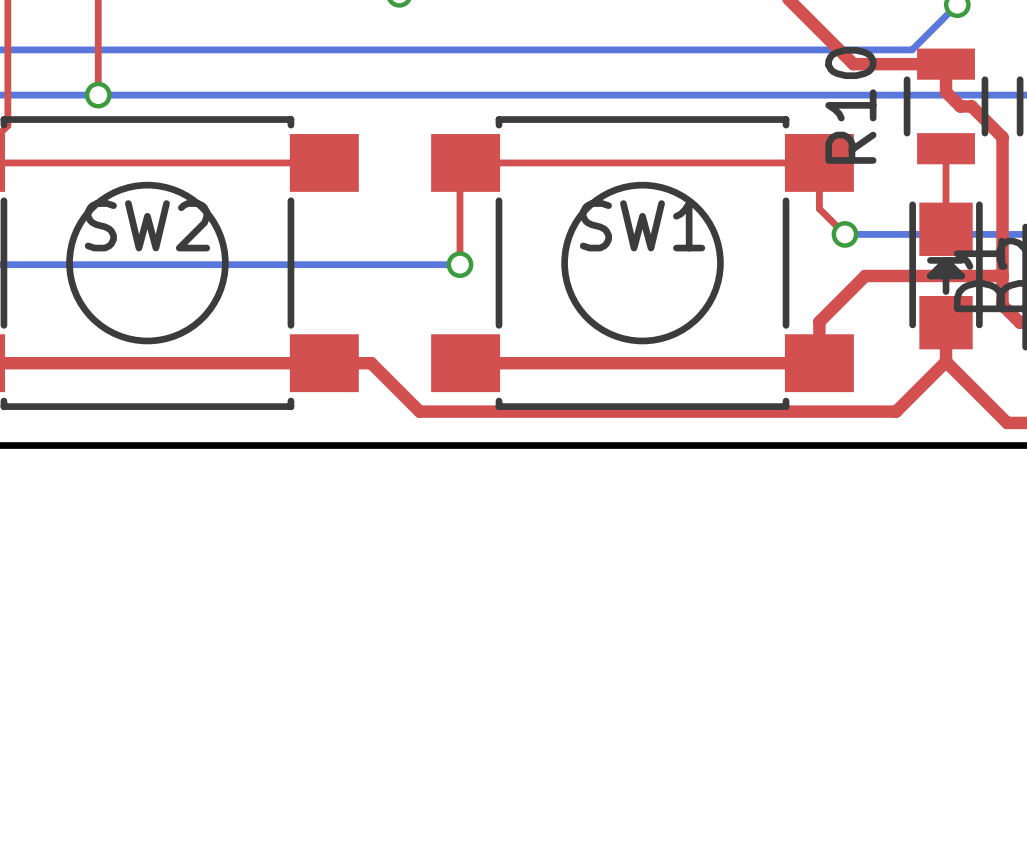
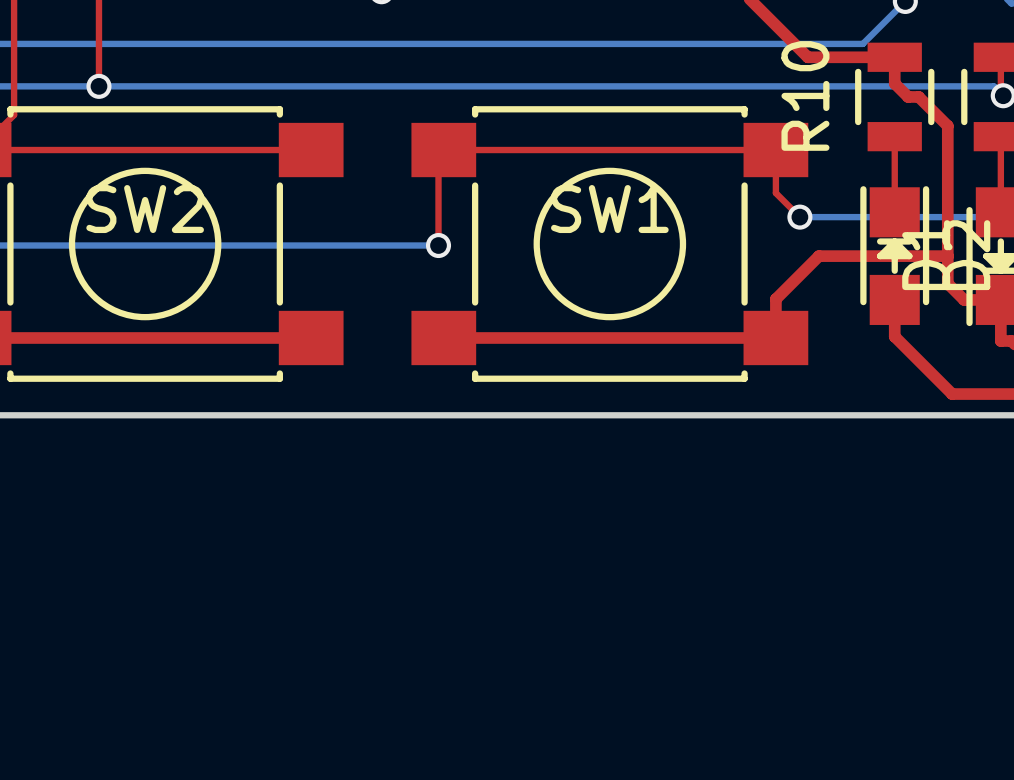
top track: (946, 361) (896, 411) (419, 411) (371, 363) (324, 363) -> none

